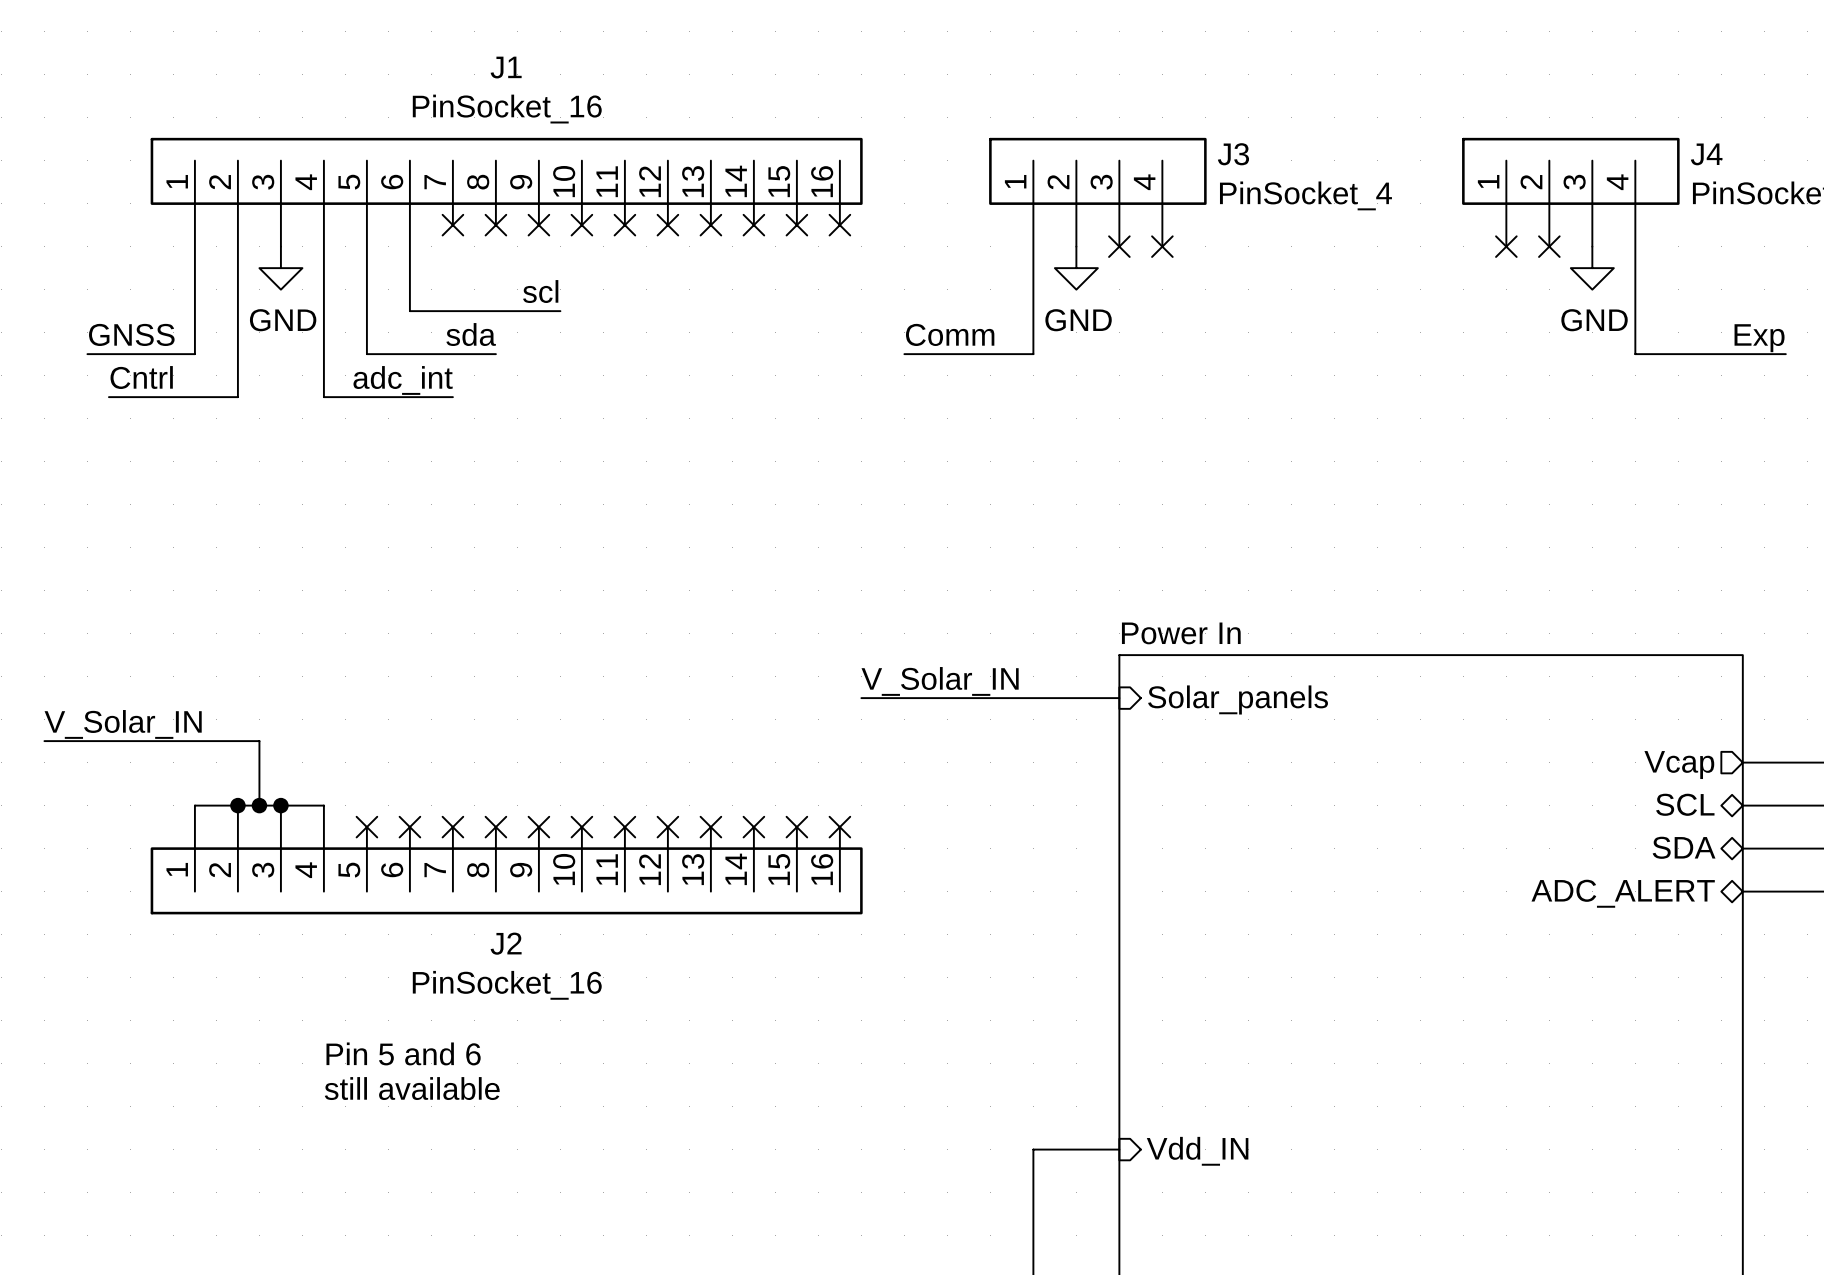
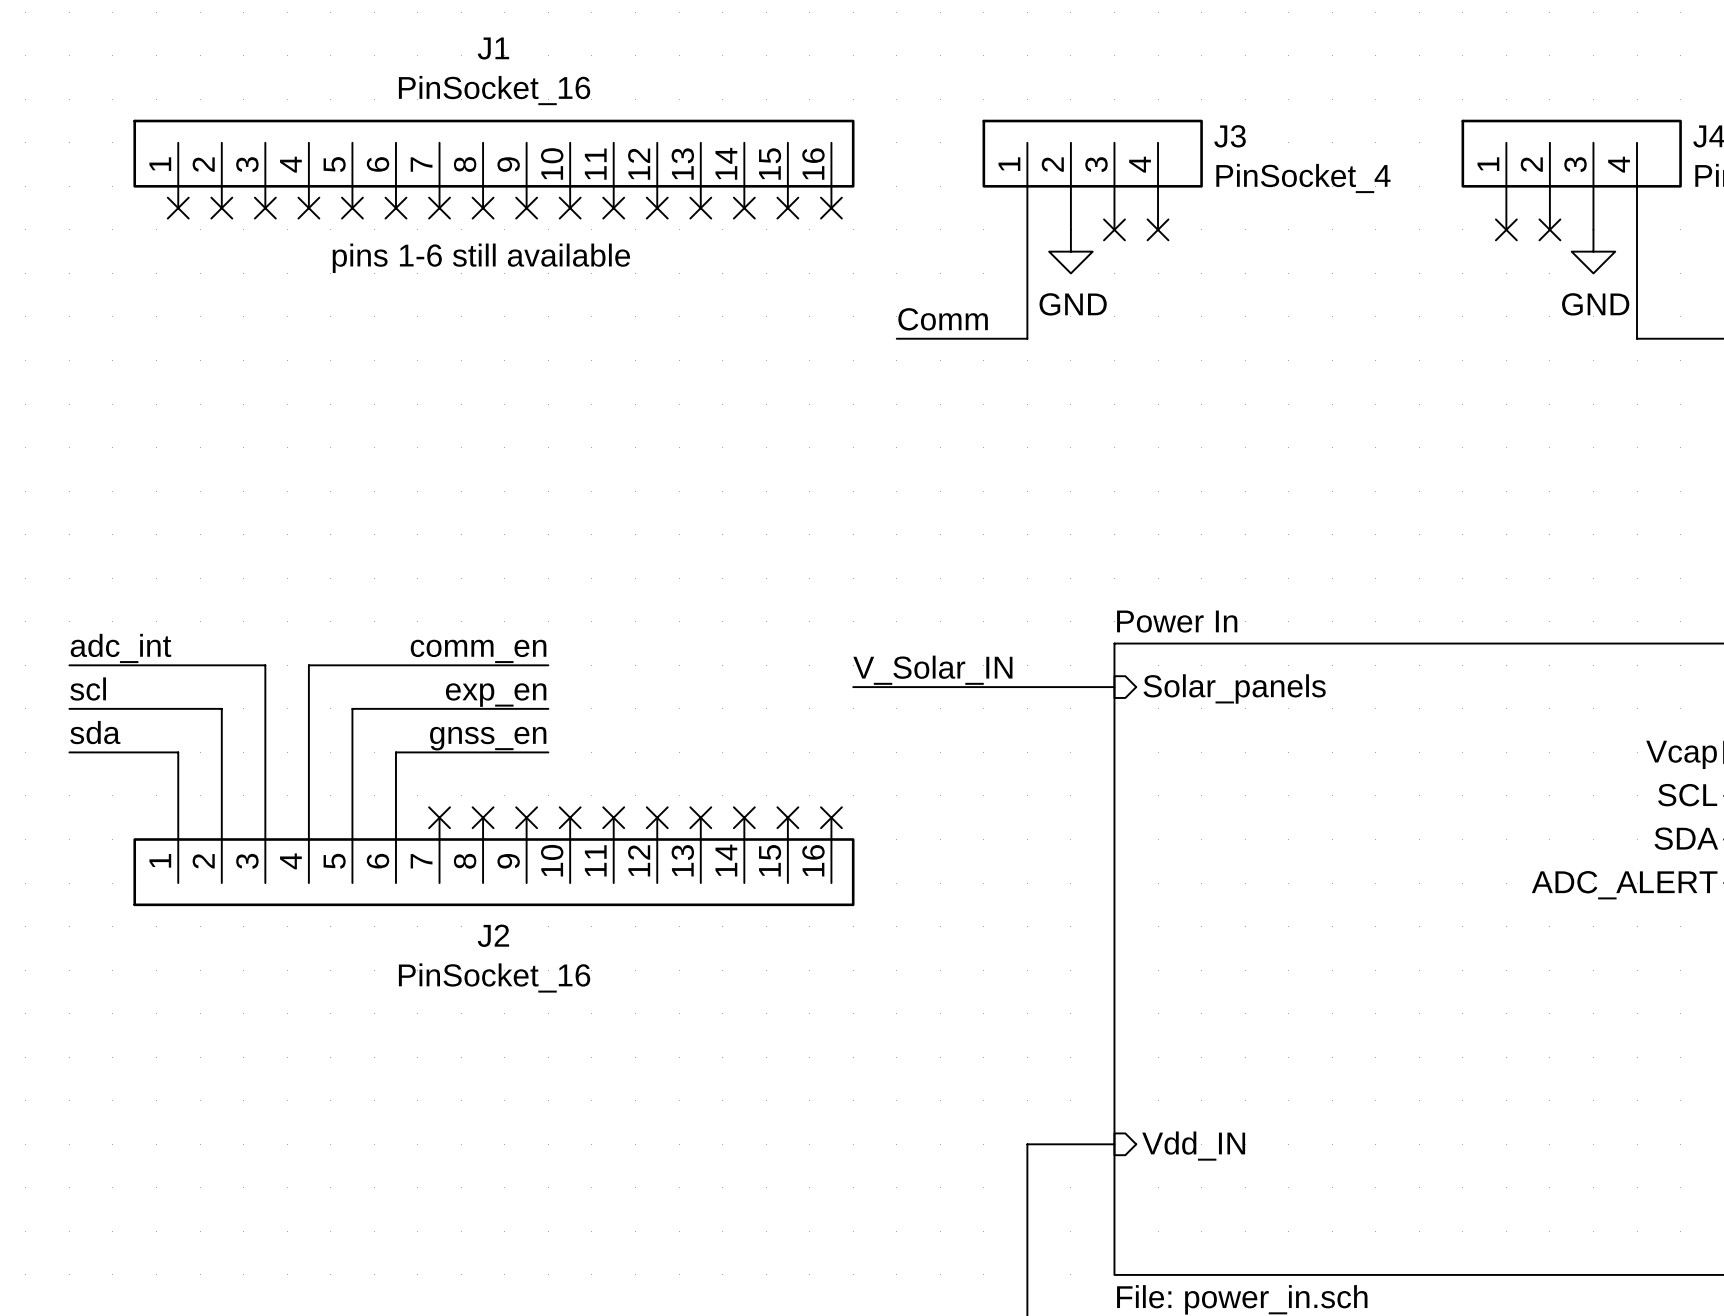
wire: (194, 225) (194, 354) (87, 354) -> none
no-connect mark: none -> (178, 208)
wire: (237, 225) (237, 397) (108, 397) -> none
no-connect mark: none -> (221, 208)
wire: (280, 225) (280, 246) -> none
no-connect mark: none -> (265, 208)
wire: (323, 225) (323, 397) (452, 397) -> none
no-connect mark: none -> (308, 208)
wire: (366, 225) (366, 354) (495, 354) -> none
no-connect mark: none -> (352, 208)
wire: (409, 225) (409, 311) (560, 311) -> none
no-connect mark: none -> (395, 208)
power symbol: GND (280, 268) -> none
text: none -> pins 1-6 still available (481, 258)
label: scl (540, 291) -> none
label: GNSS (131, 334) -> none
label: sda (471, 334) -> none
label: Cntrl (141, 377) -> none
label: adc_int (403, 380) -> none
label: none -> adc_int (120, 648)
label: none -> comm_en (478, 651)
wire: none -> (69, 665) (265, 665) (265, 795)
wire: none -> (548, 665) (308, 665) (308, 795)
label: none -> scl (88, 689)
label: none -> exp_en (496, 695)
wire: none -> (69, 708) (221, 708) (221, 795)
wire: none -> (548, 708) (352, 708) (352, 817)
label: V_Solar_IN (123, 724) -> none
wire: (44, 741) (259, 741) (259, 805) -> none
label: none -> sda (95, 732)
label: none -> gnss_en (488, 738)
wire: none -> (548, 752) (395, 752) (395, 817)
wire: (194, 805) (323, 805) -> (178, 795) (178, 752) (69, 752)
junction: (237, 805) -> none
junction: (259, 805) -> none
junction: (280, 805) -> none
no-connect mark: (366, 827) -> none
no-connect mark: (409, 827) -> none
text: Pin 5 and 6 (403, 1053) -> none
text: still available (412, 1088) -> none

